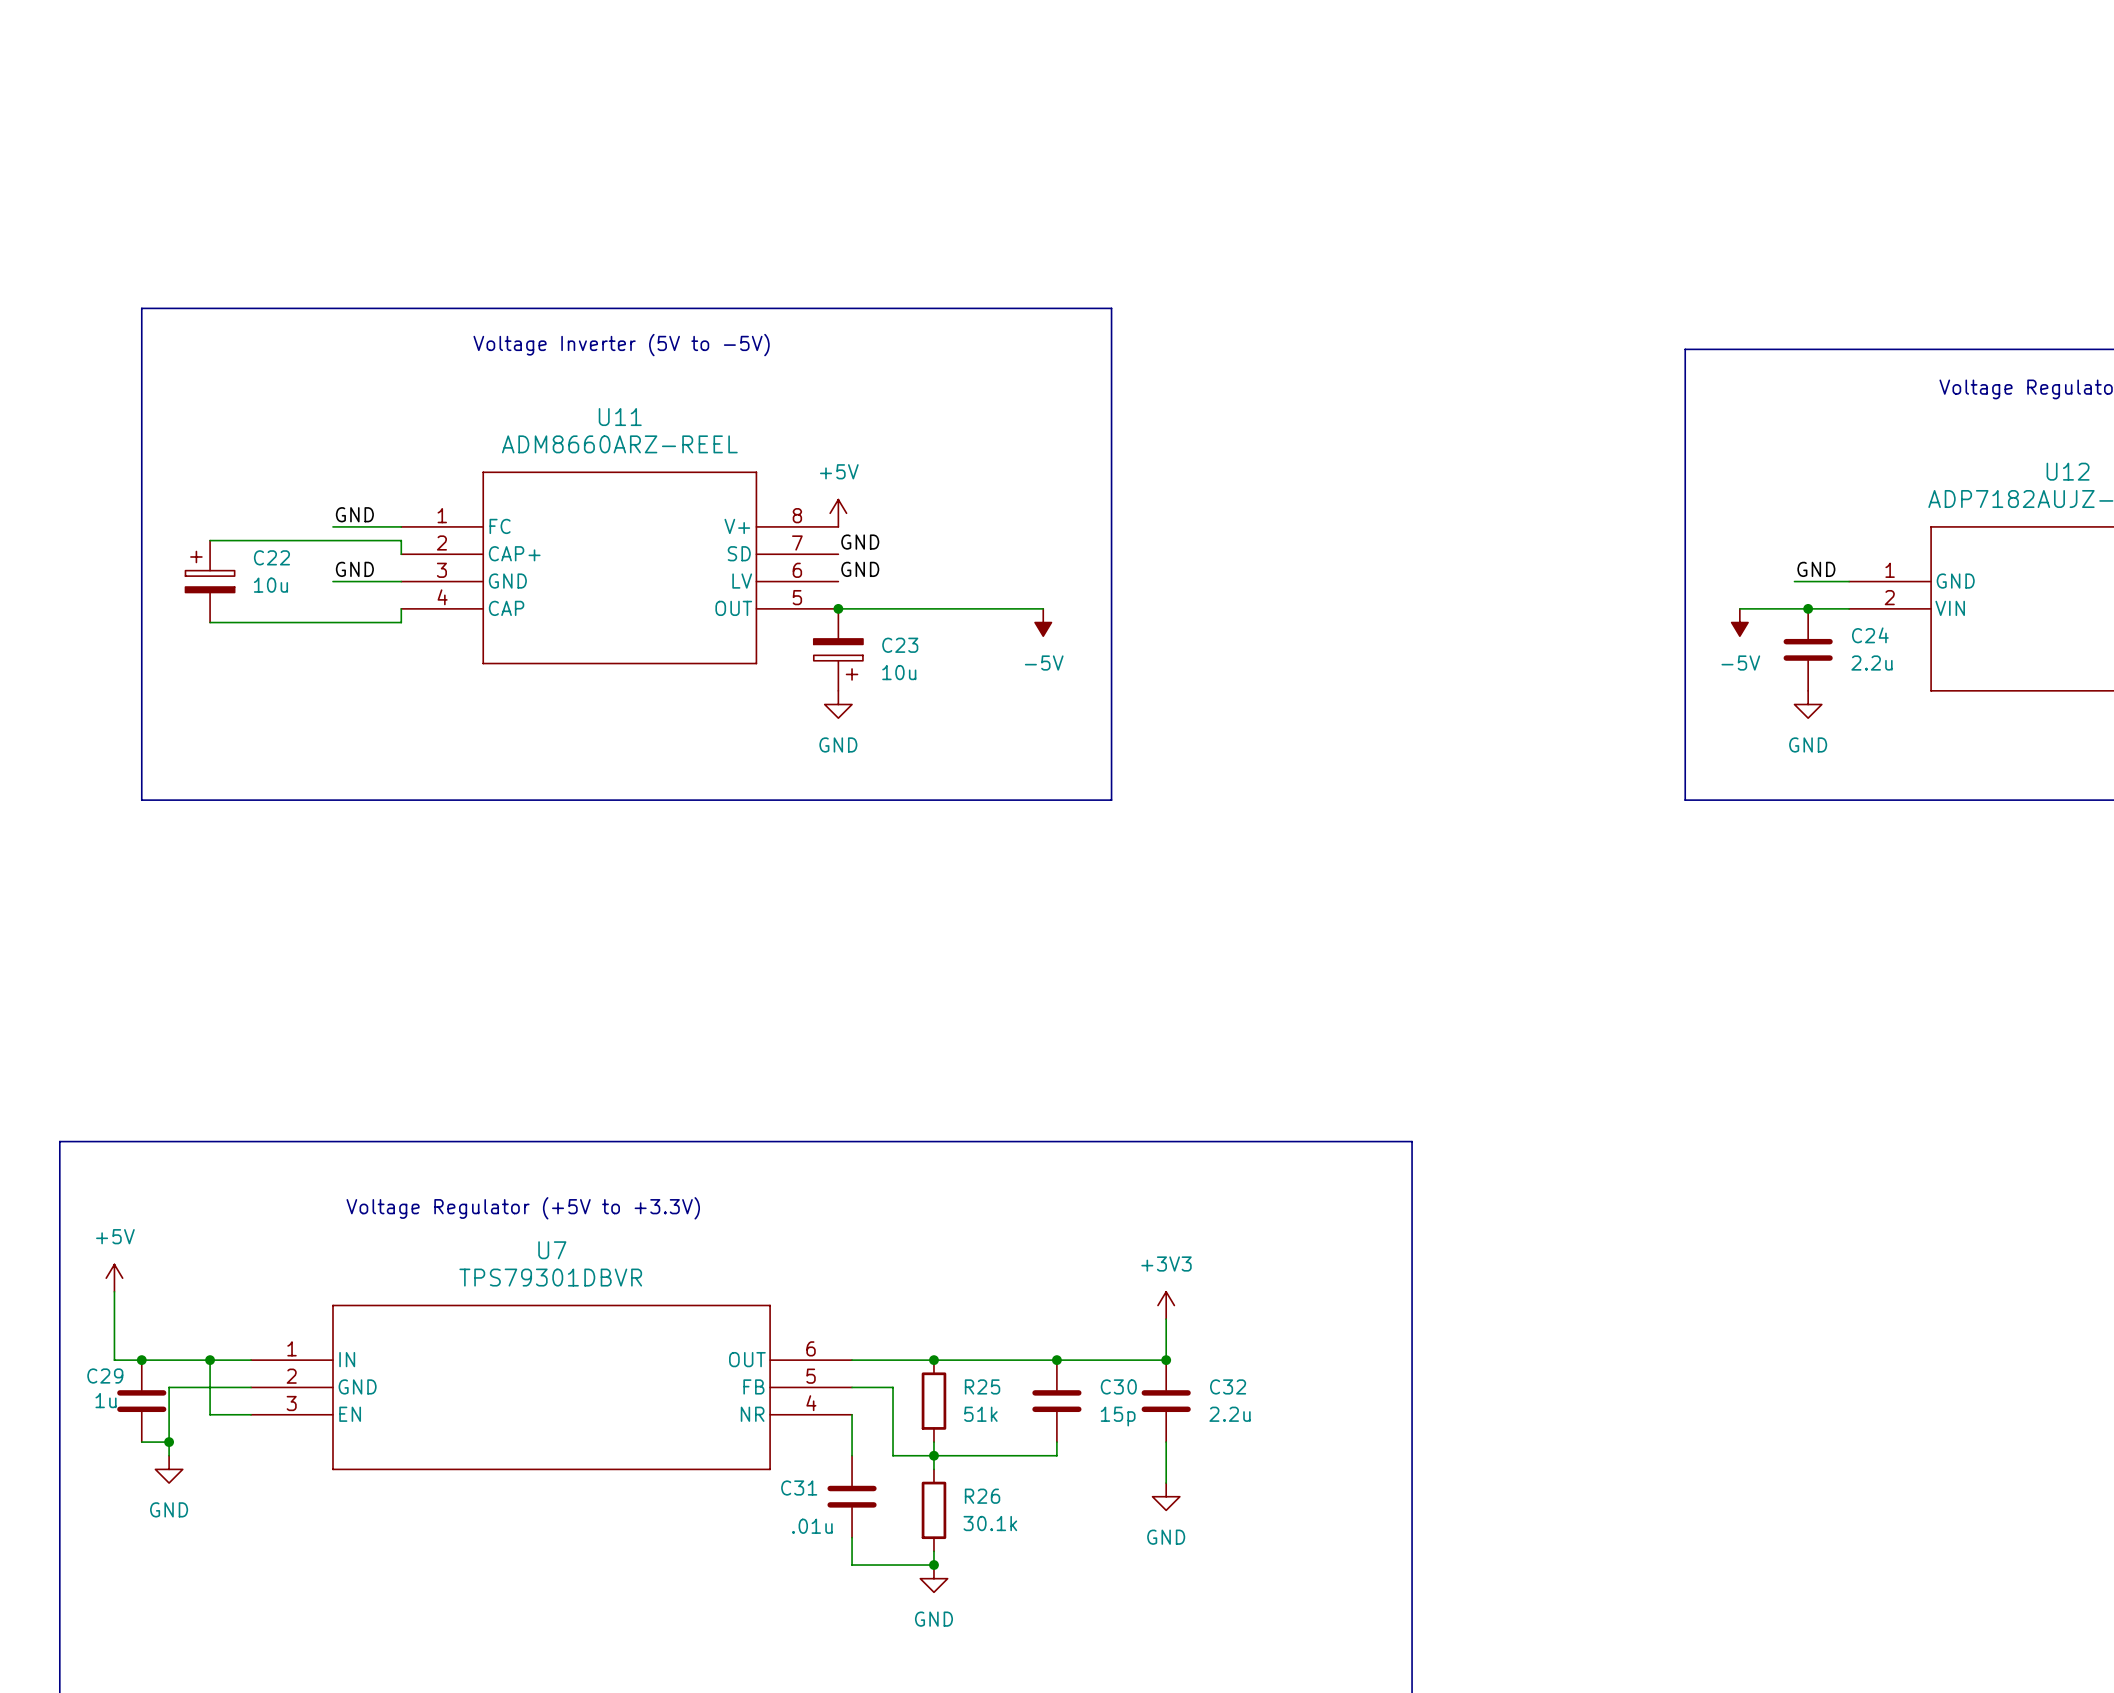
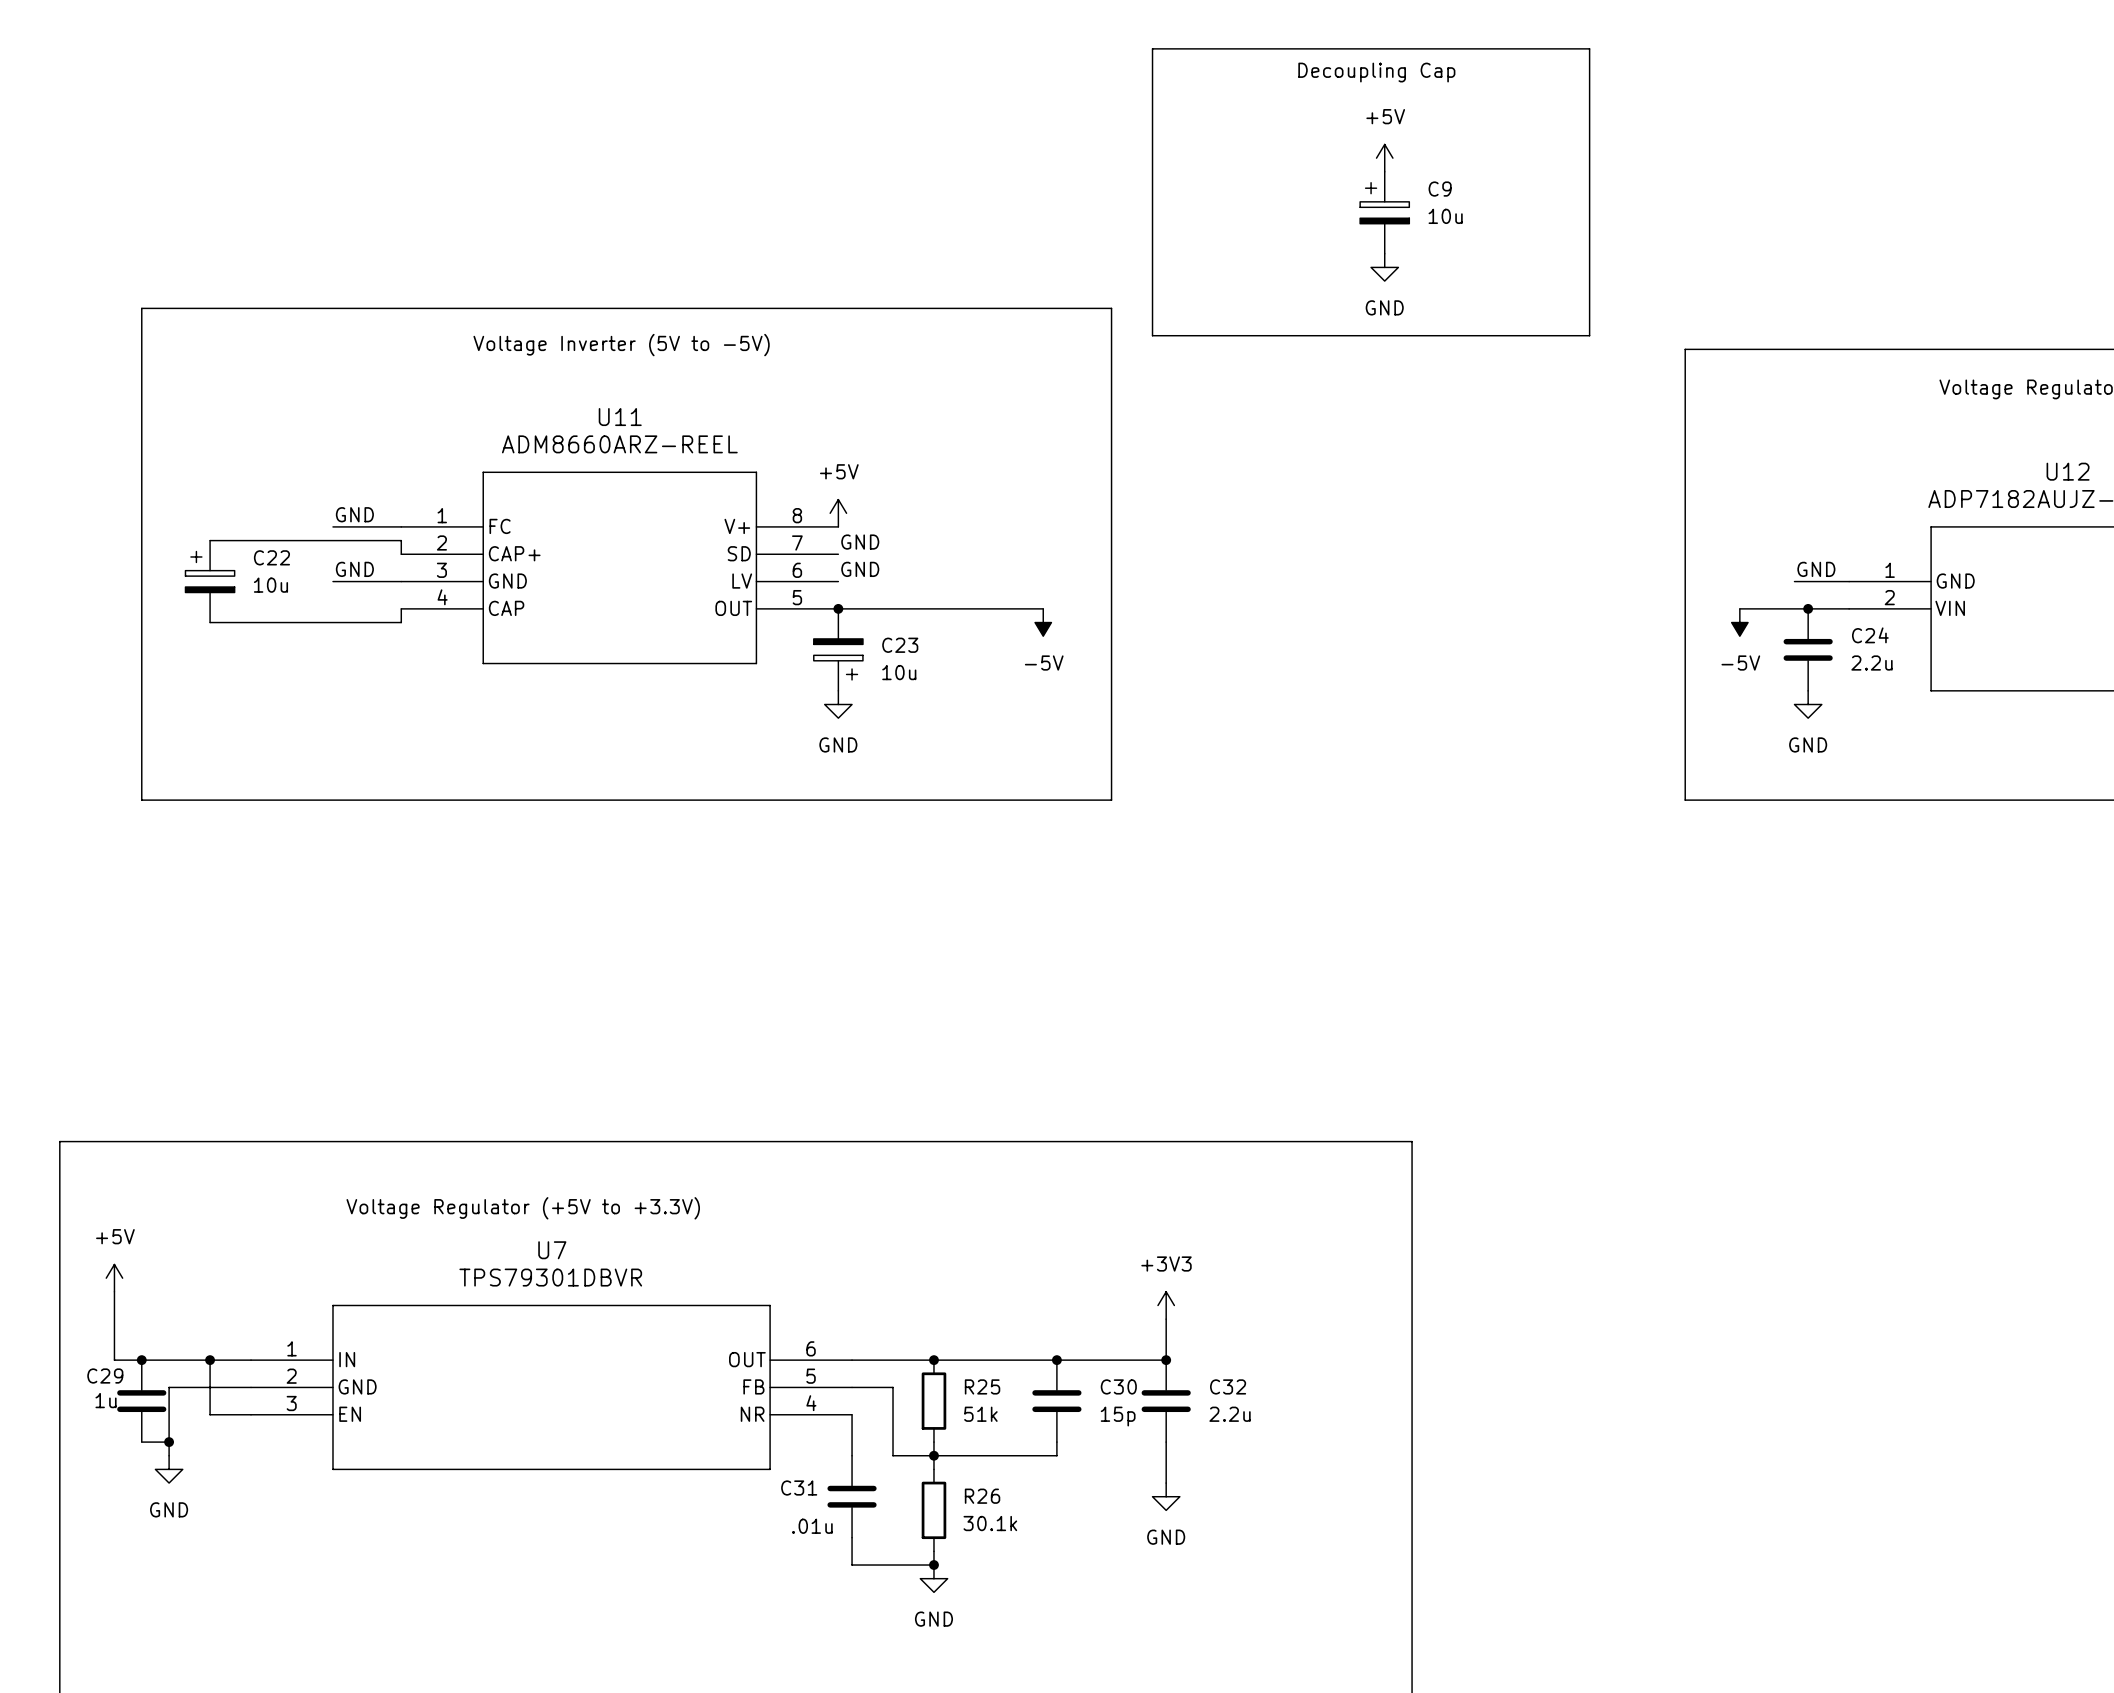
line: none -> (1152, 48) (1589, 48) (1589, 335) (1152, 335) (1152, 48)
text: none -> Decoupling Cap (1376, 72)
power symbol: none -> +5V (1384, 158)
C9: none -> 10u (1384, 212)
power symbol: none -> GND (1384, 267)

